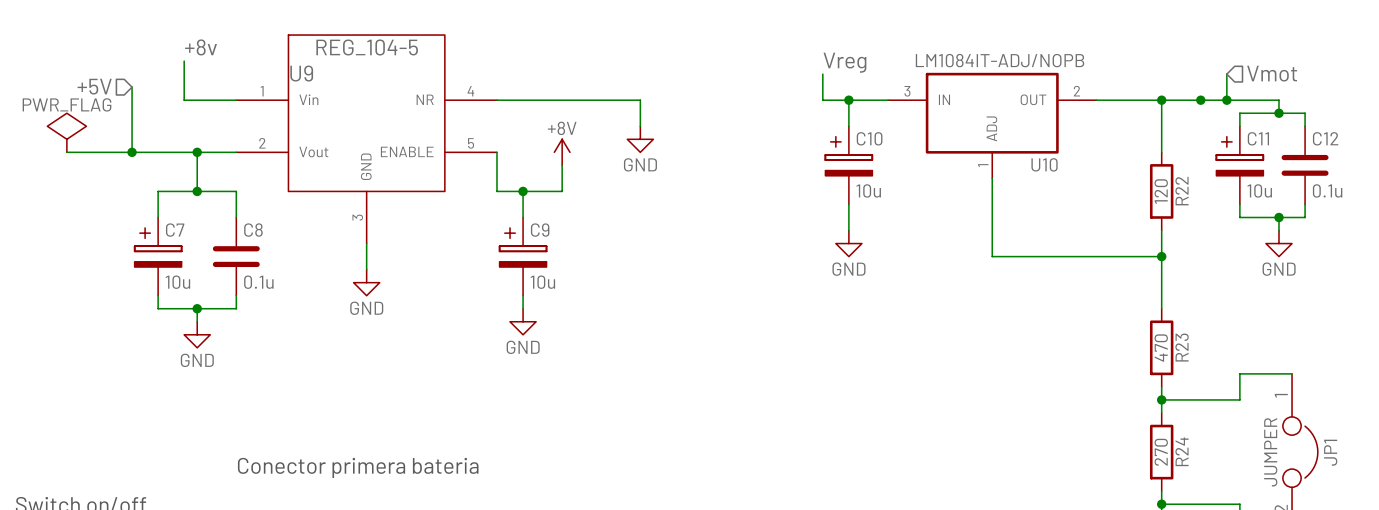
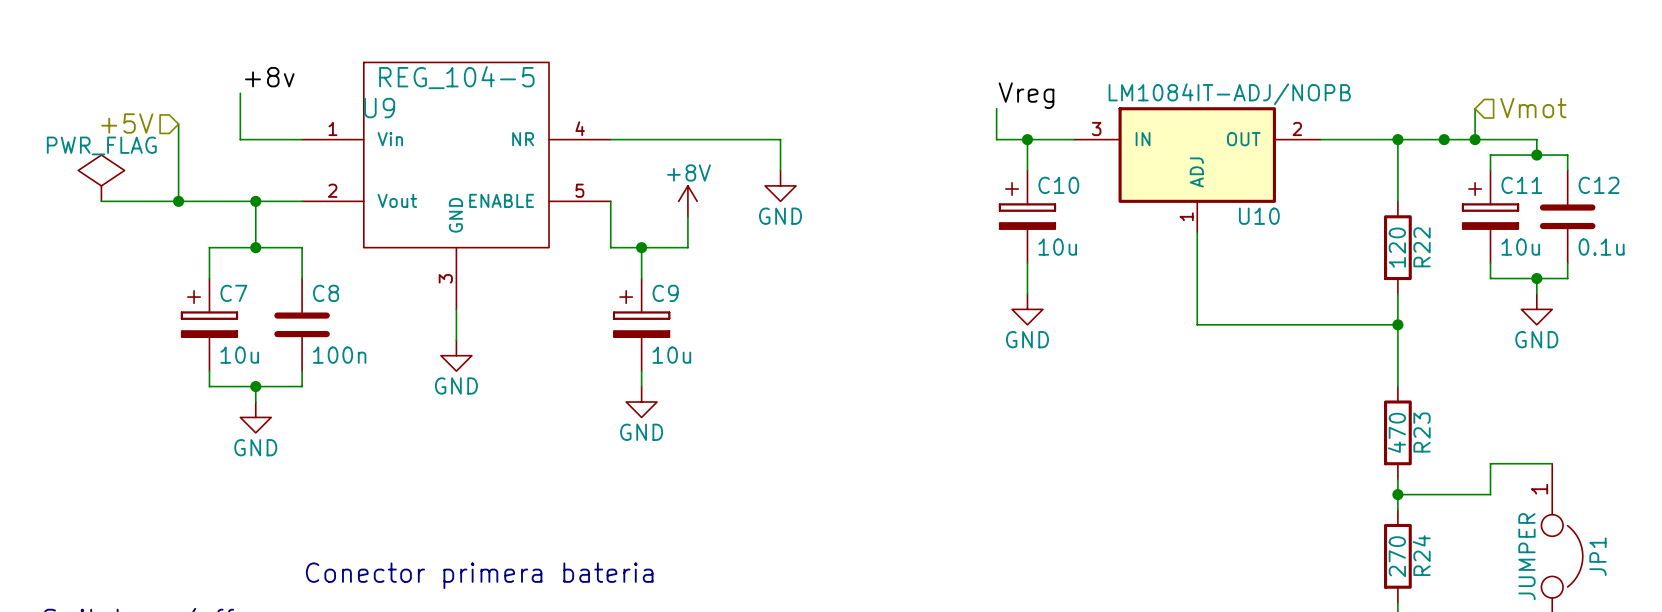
C8 value: 0.1u (258, 282) -> 100n (339, 355)

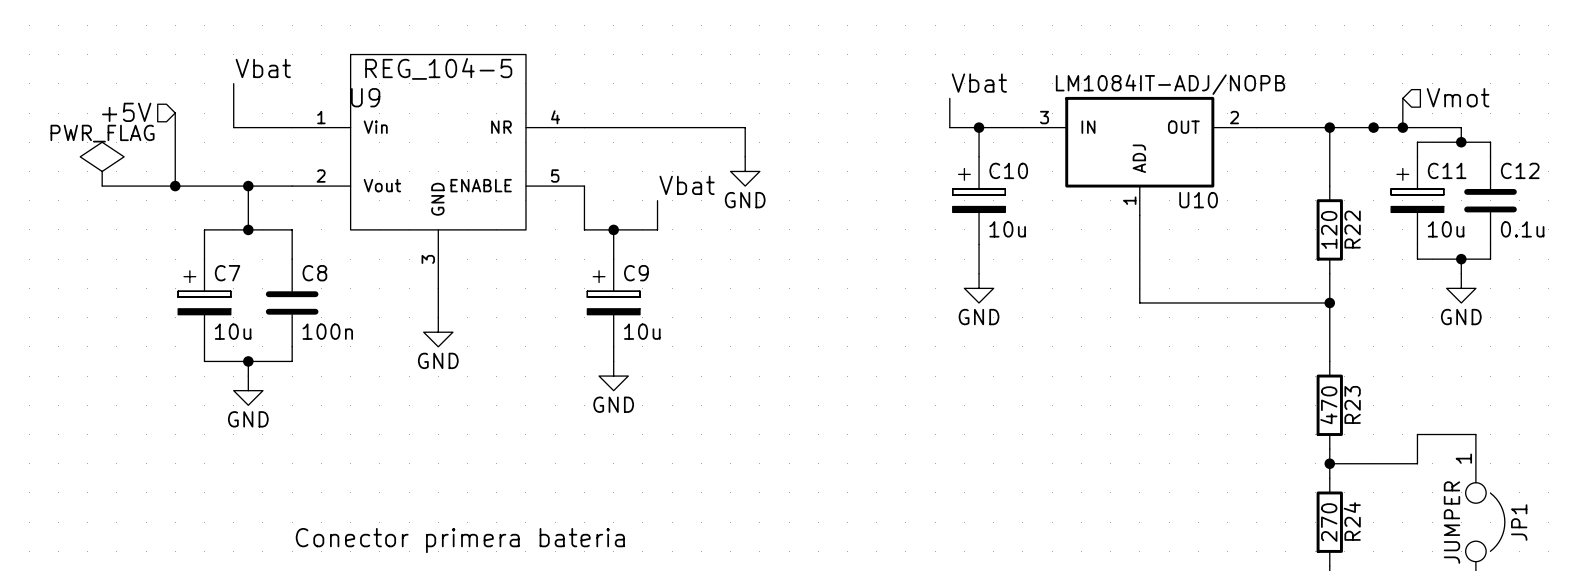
label: +8v (269, 77) -> Vbat (263, 68)
label: Vreg (1026, 95) -> Vbat (979, 83)
label: none -> Vbat (687, 185)
power symbol: +8V (687, 201) -> none

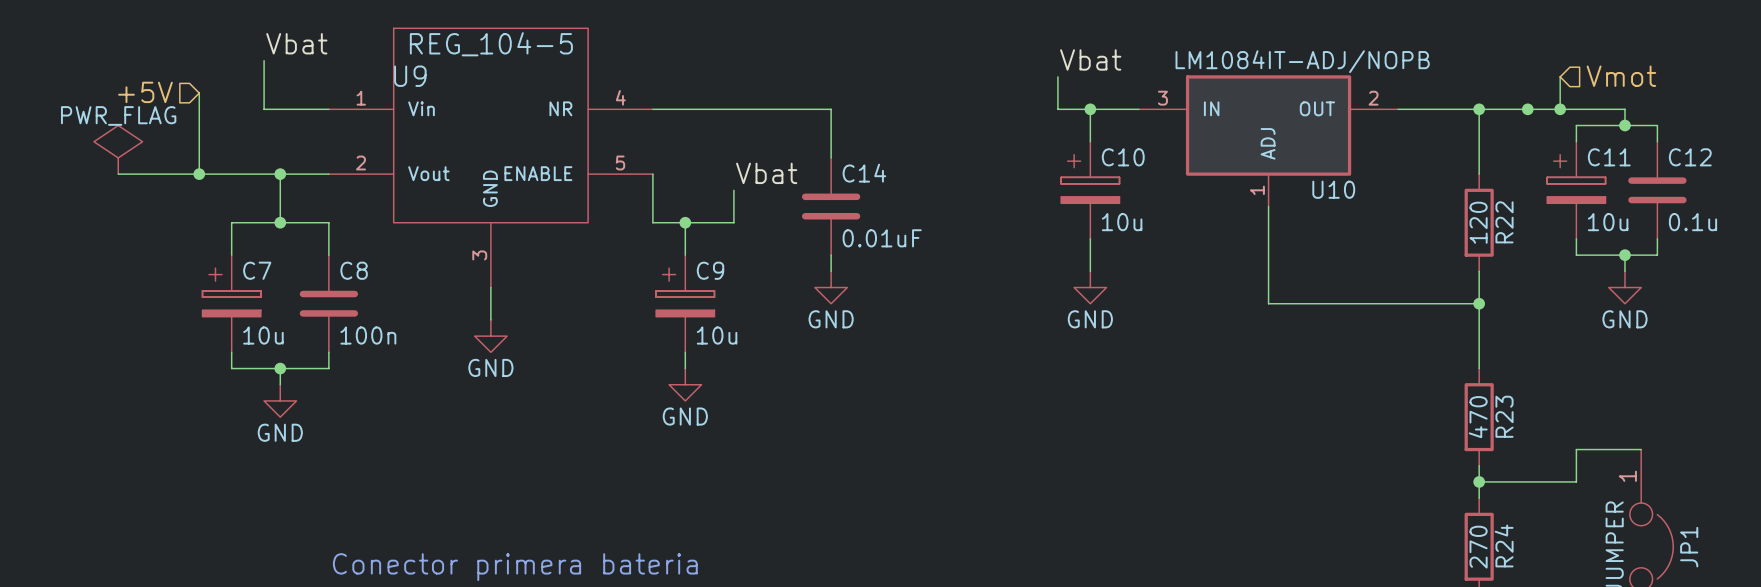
power symbol position: GND (745, 171) -> GND (831, 287)
C14: none -> 0.01uF (831, 206)
wire: none -> (831, 255) (831, 271)

